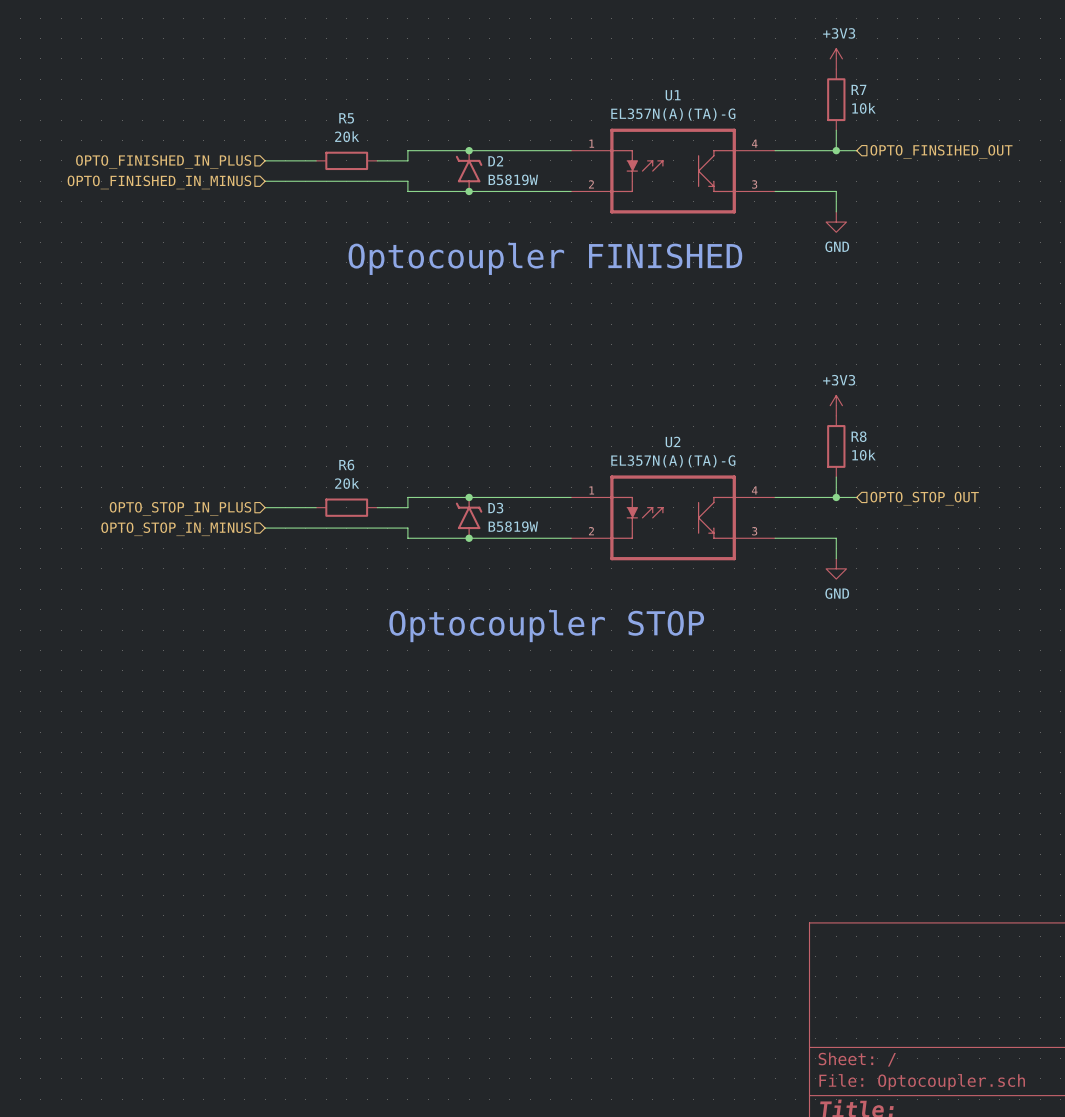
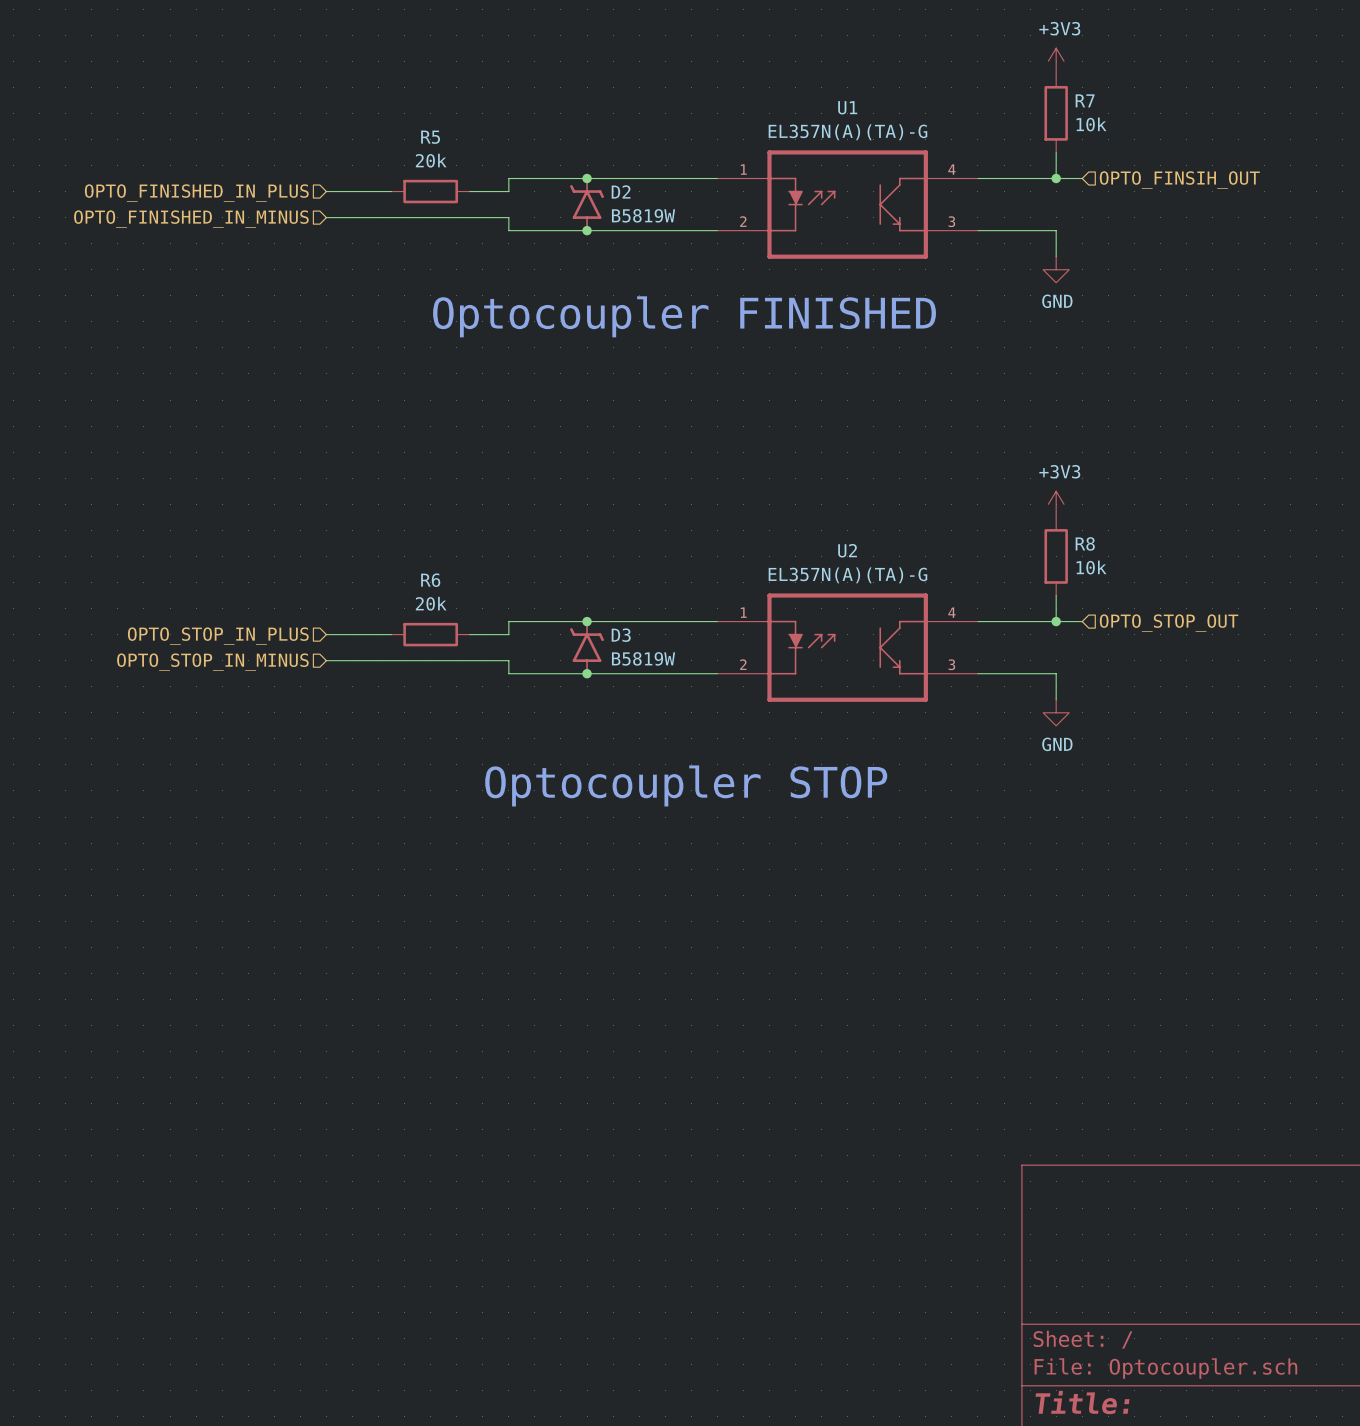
hierarchical label: OPTO_FINSIHED_OUT (941, 151) -> OPTO_FINSIH_OUT (1179, 180)

